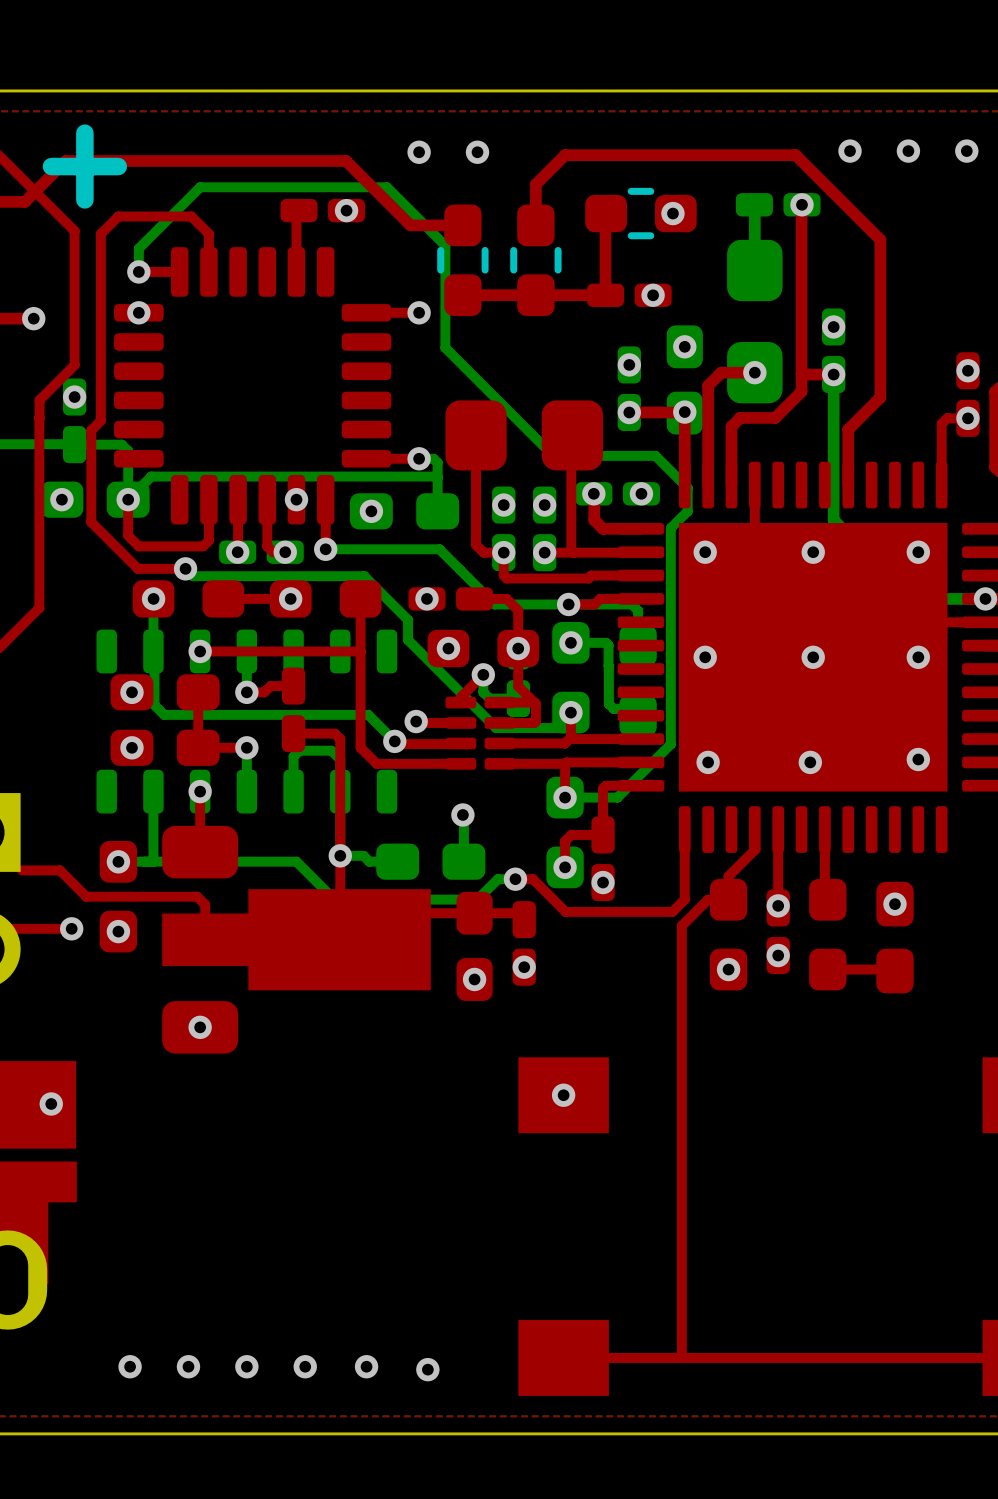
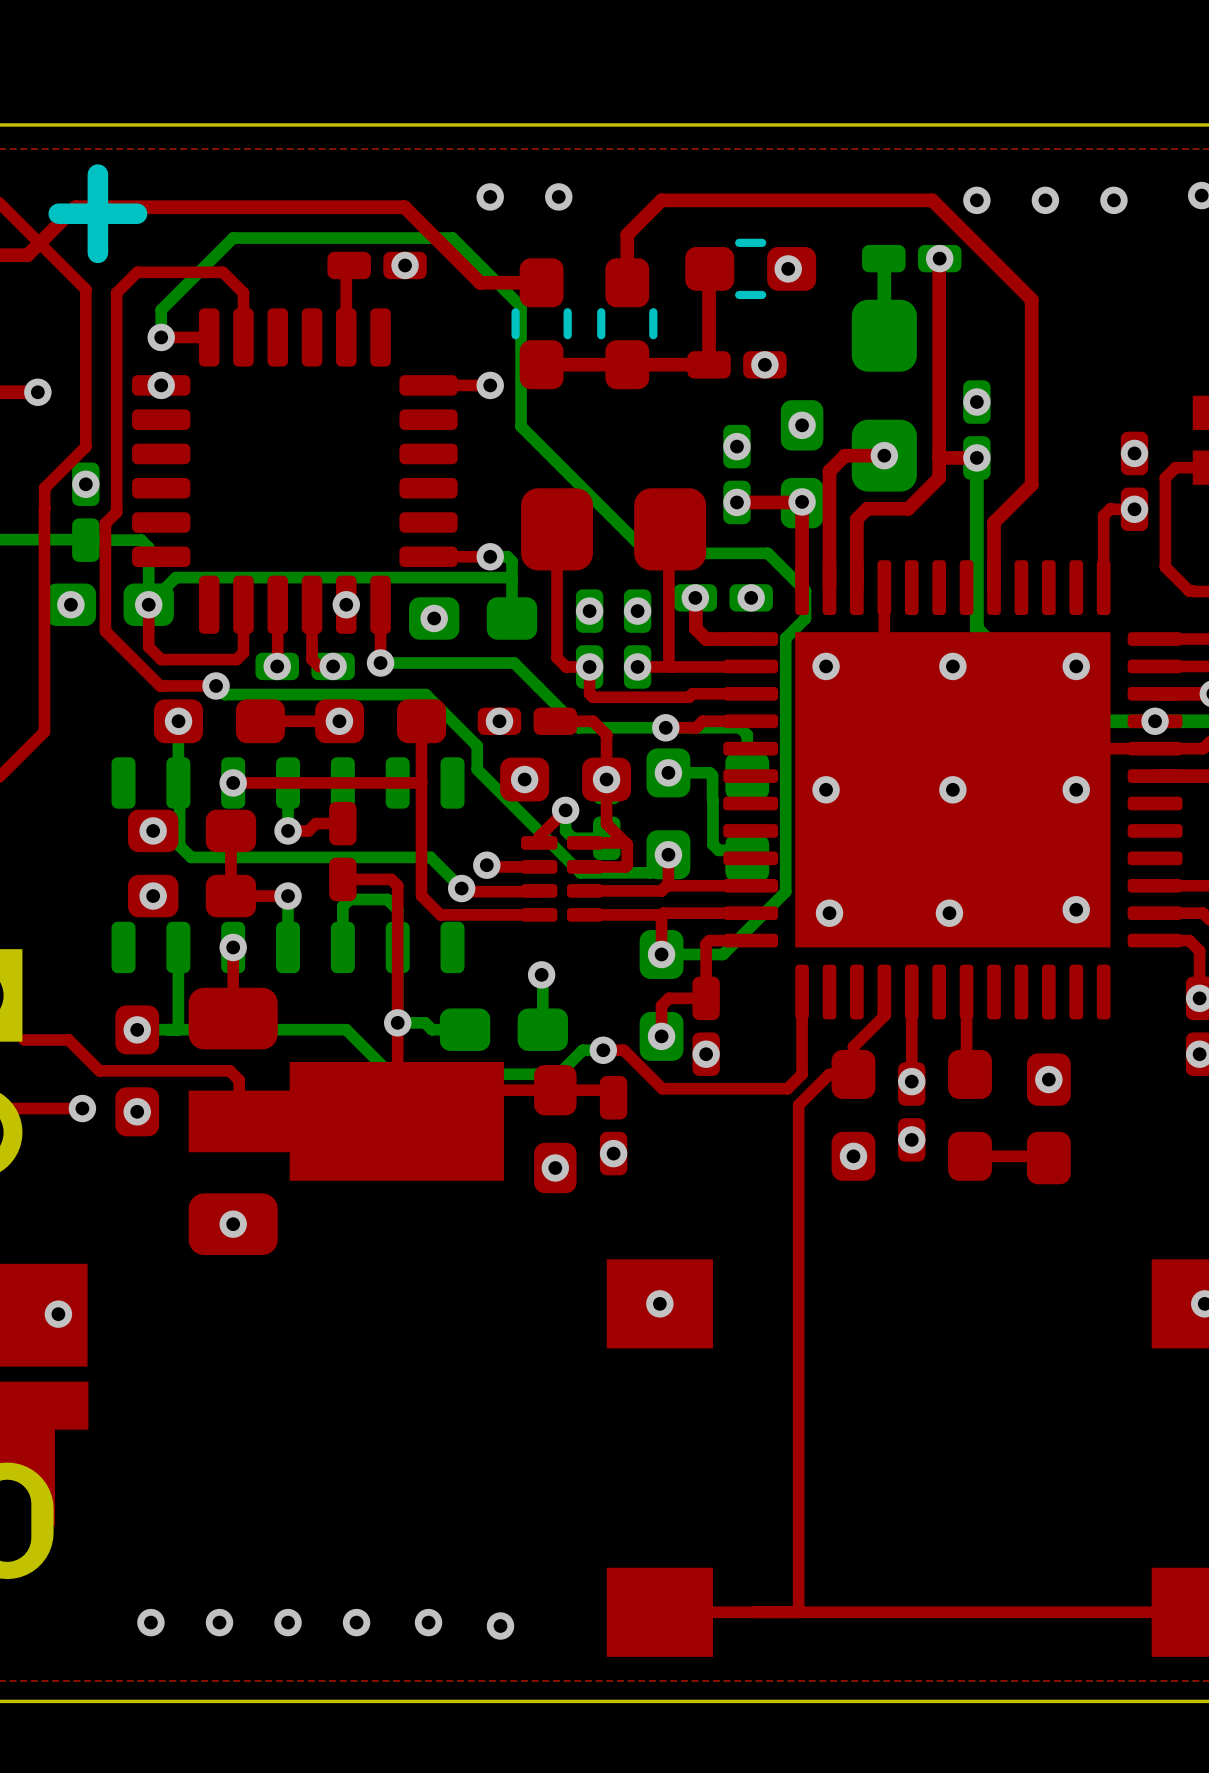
via position: (850, 151) -> (976, 200)
via position: (908, 151) -> (1045, 200)
via position: (966, 151) -> (1113, 200)

